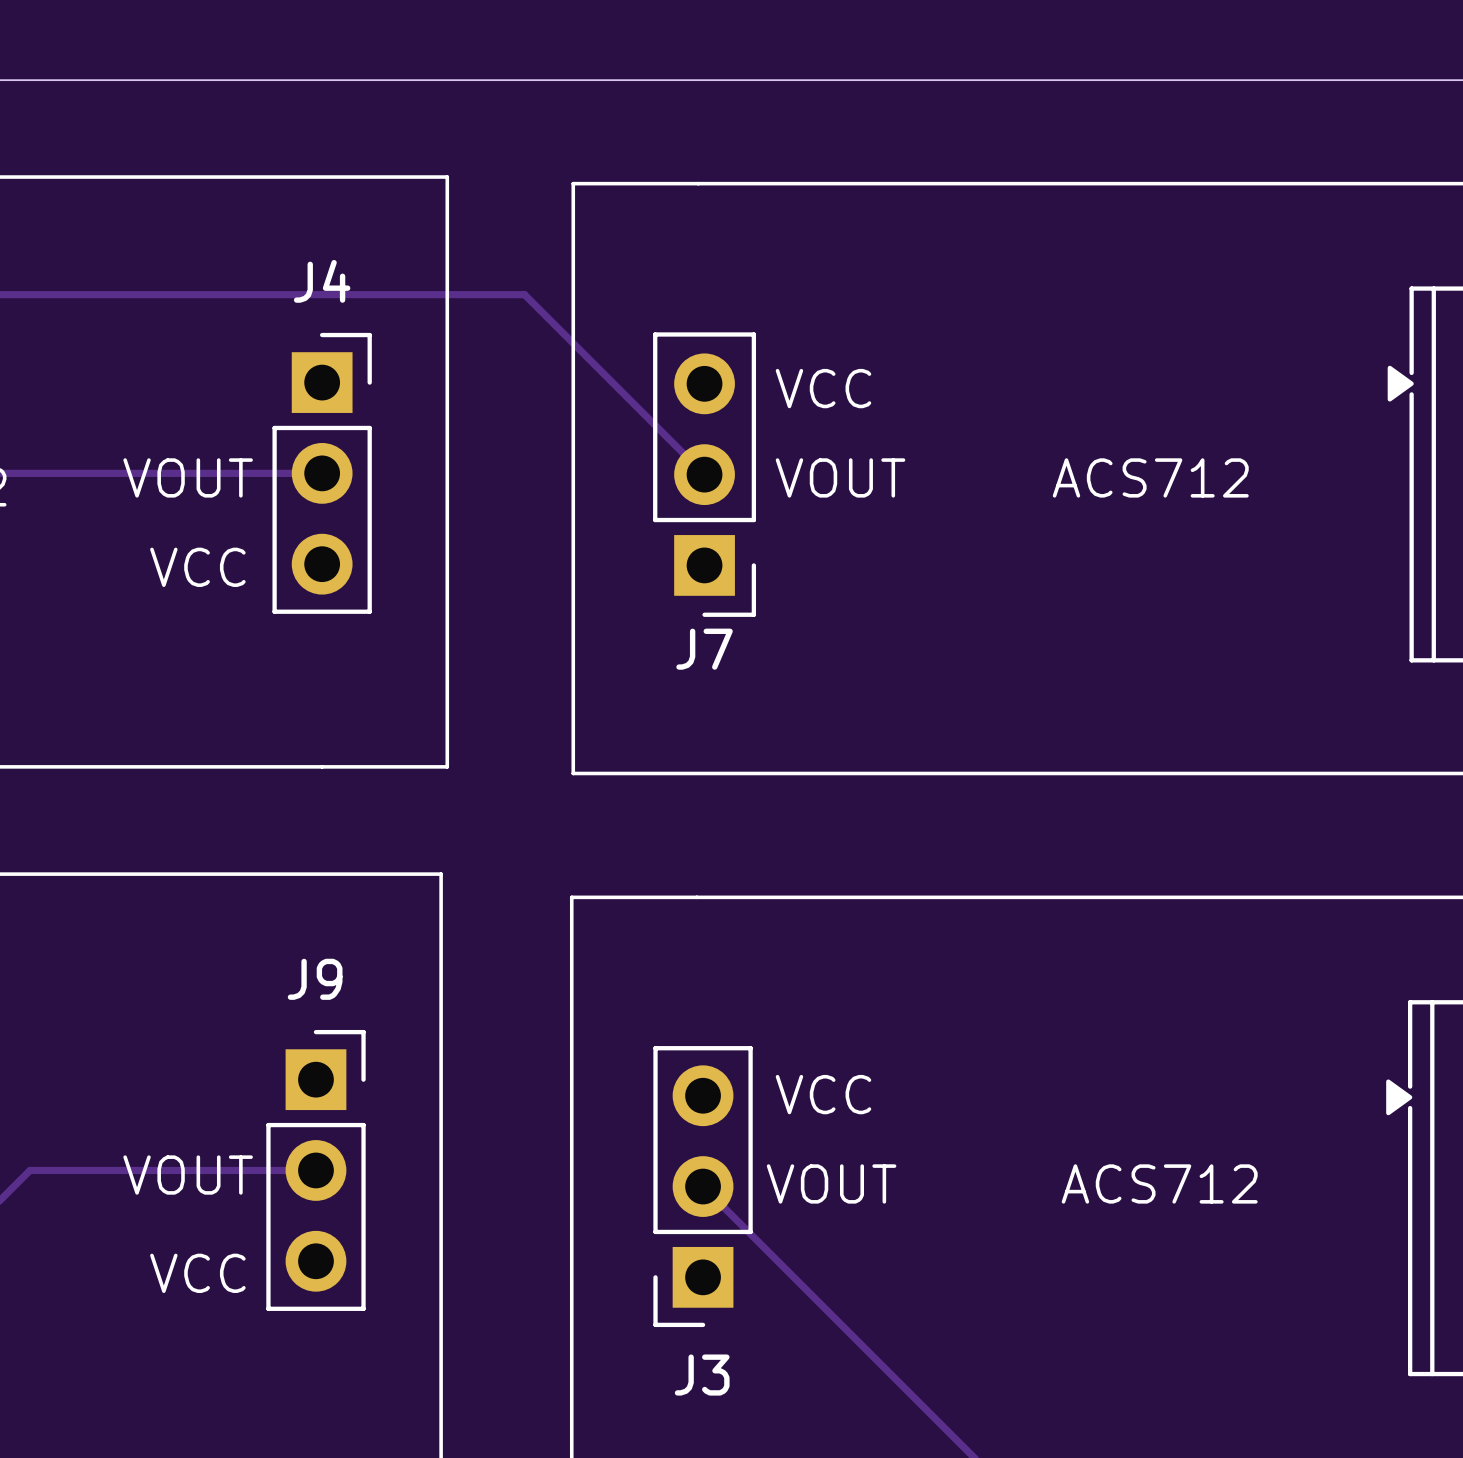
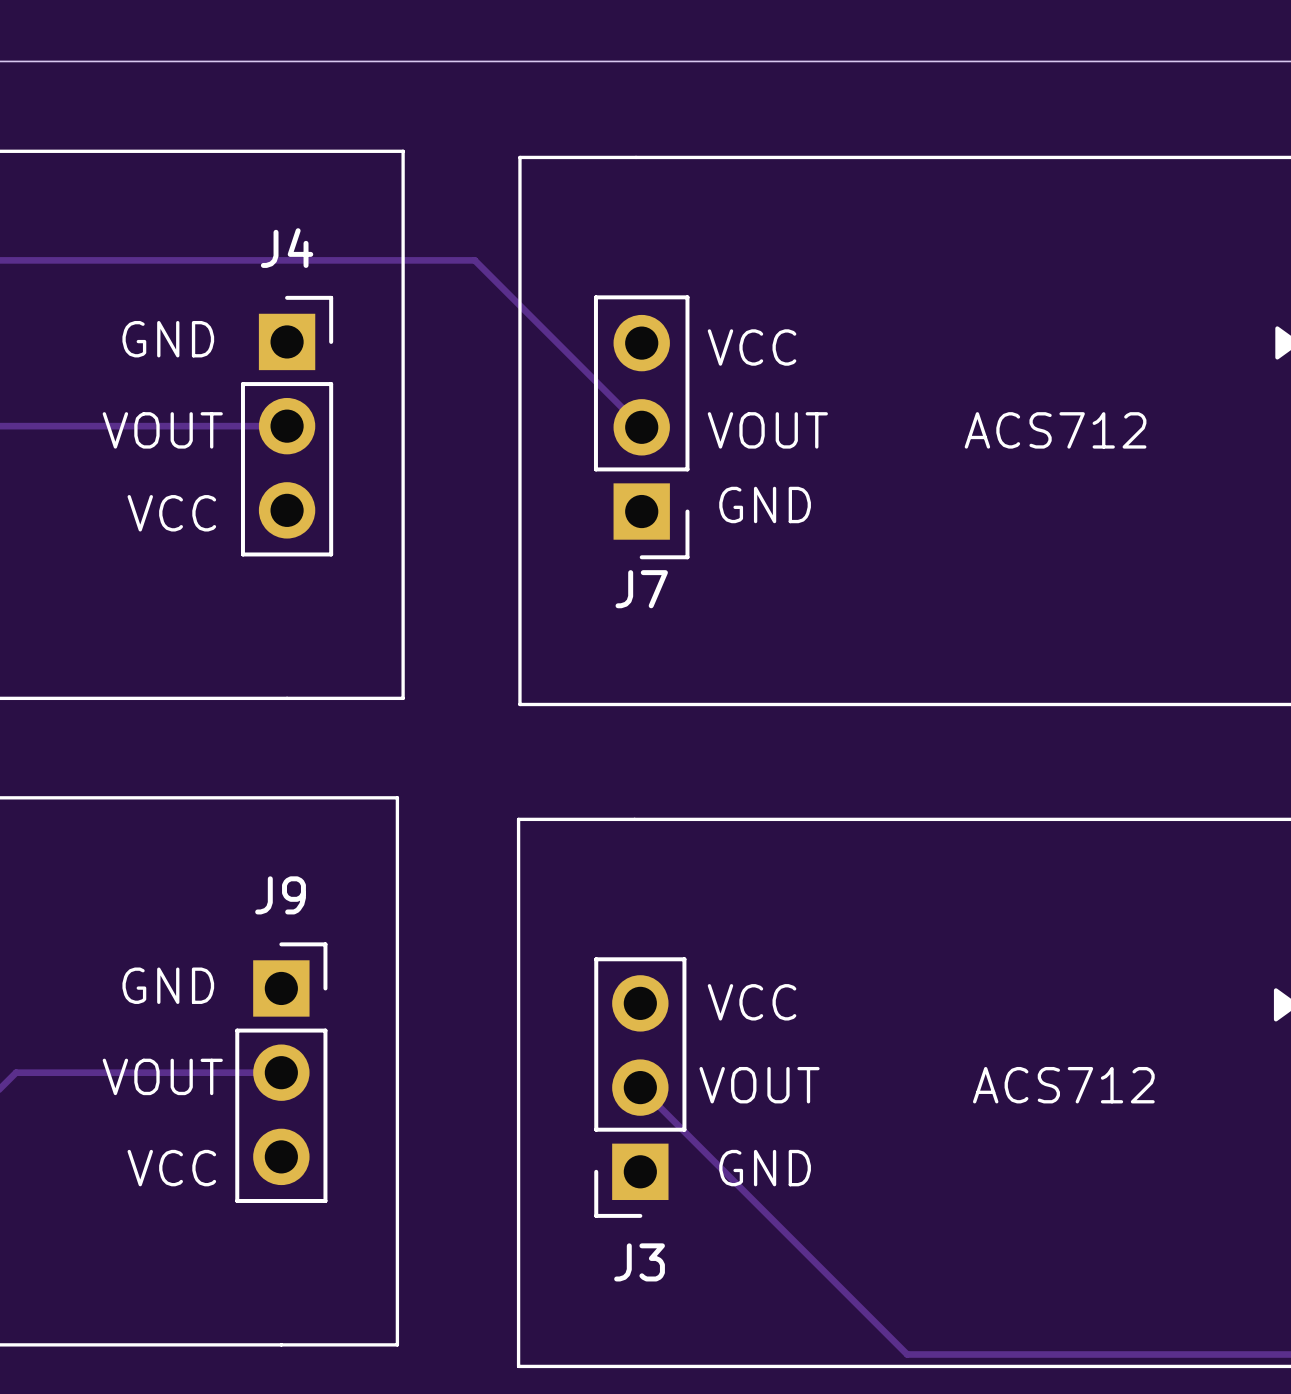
text: none -> GND (168, 339)
text: none -> GND (765, 504)
text: none -> GND (168, 985)
text: none -> GND (765, 1168)

